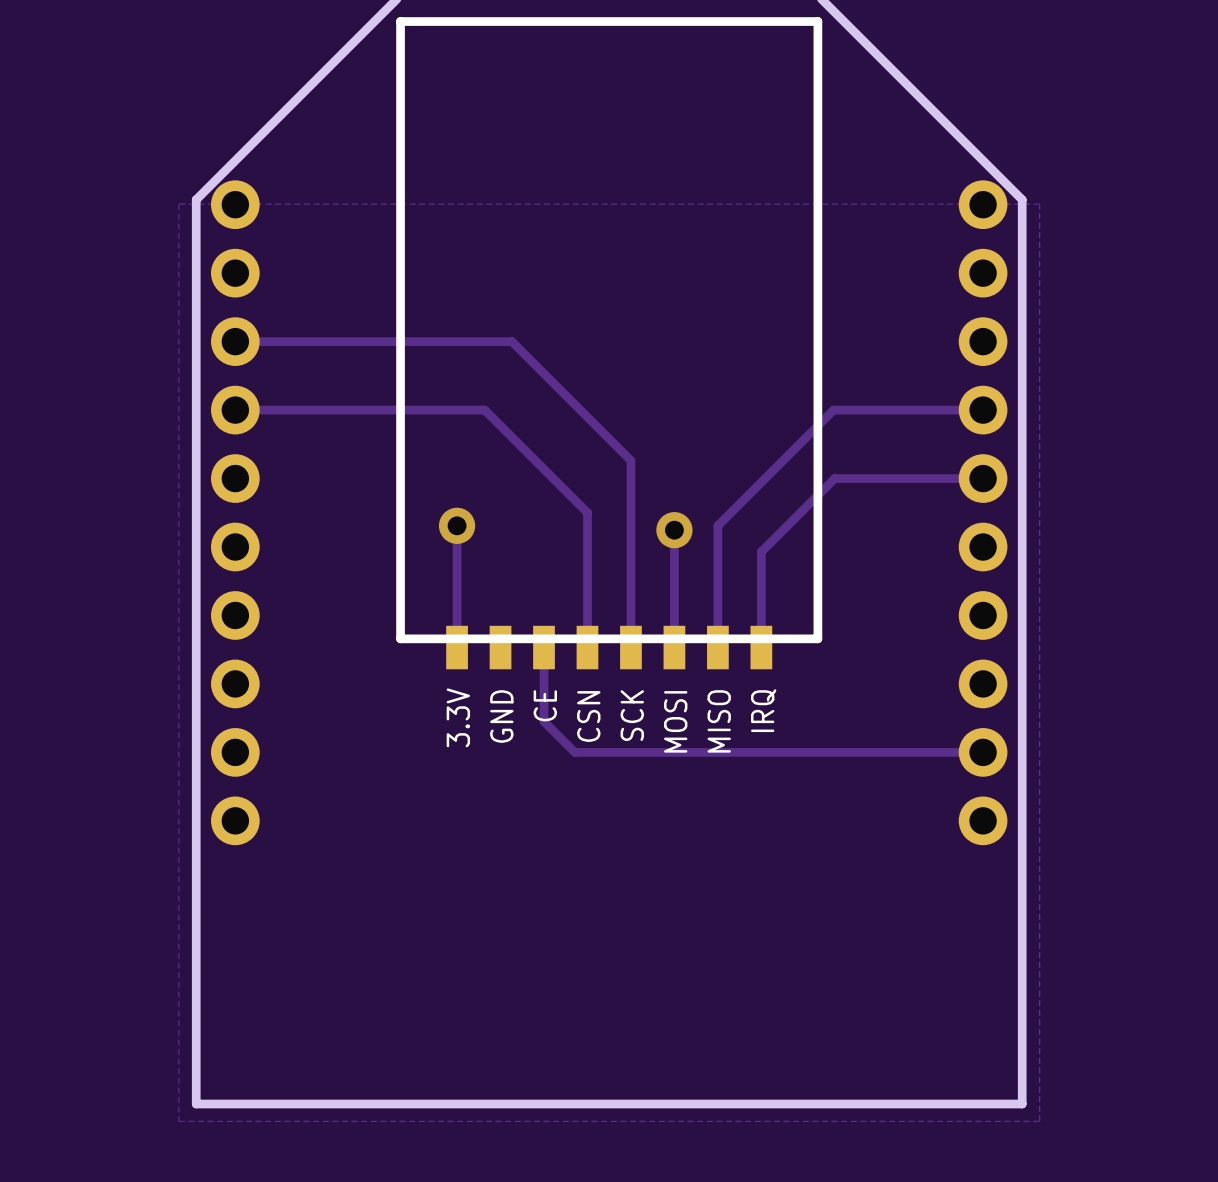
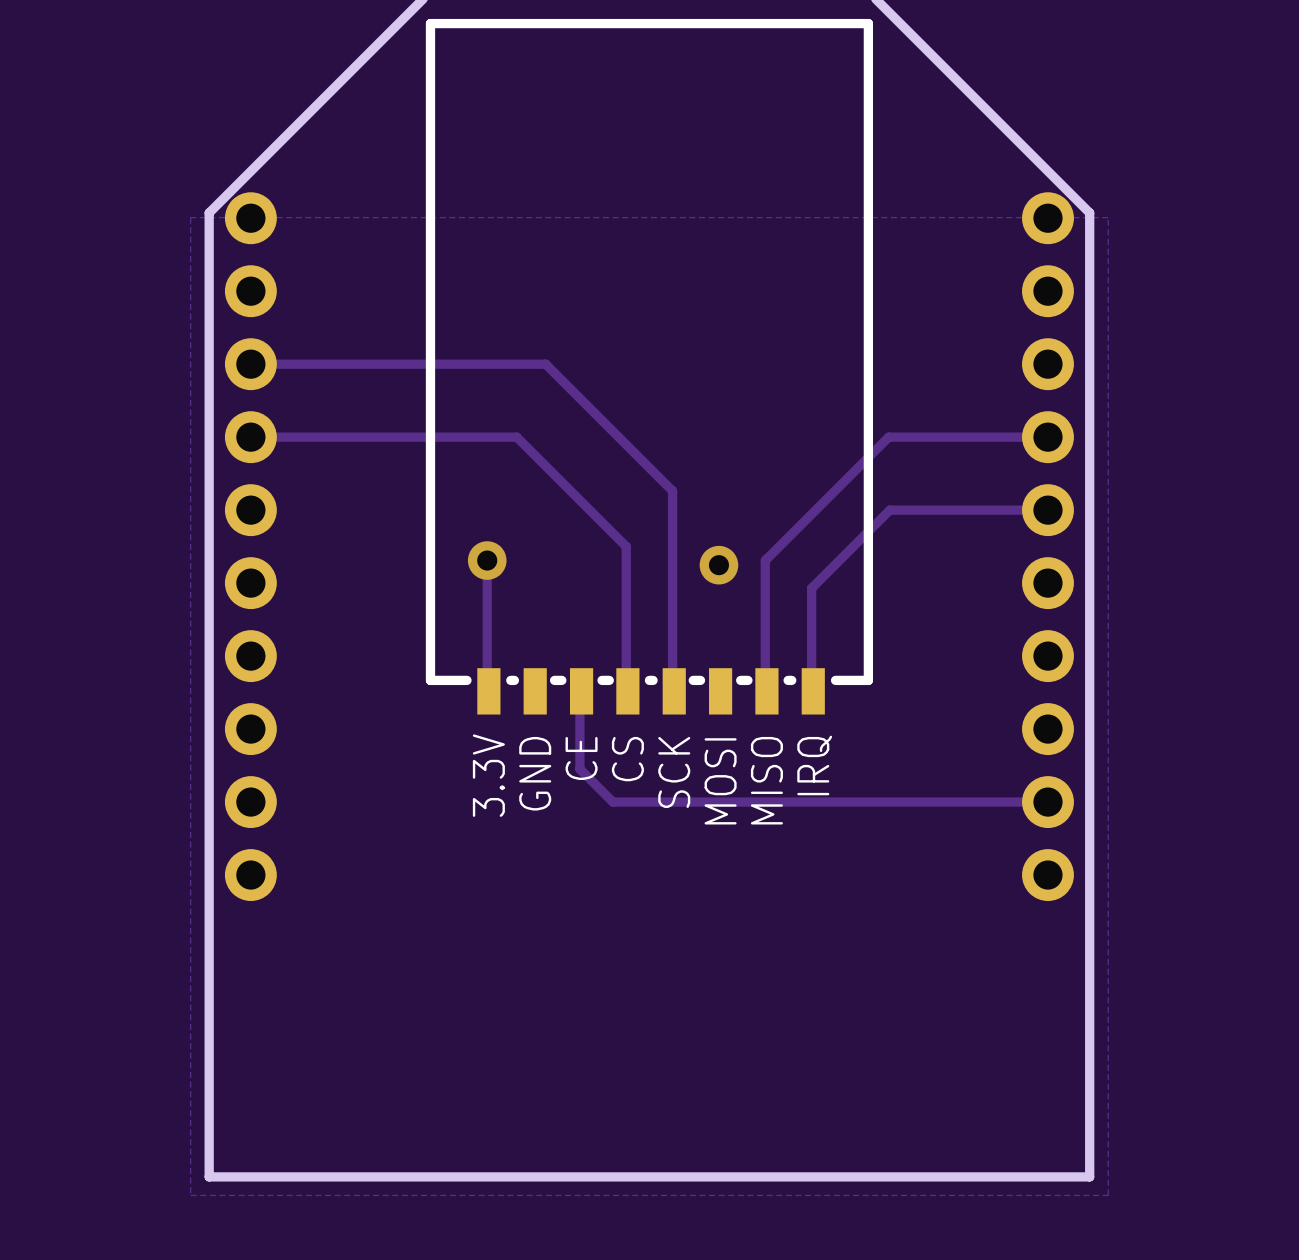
line: (817, 21) (400, 21) (400, 638) (817, 638) (817, 21) -> none
part: none -> (649, 366)
track: (674, 530) (674, 647) -> none
3.3V: (457, 647) -> none
GND: (500, 647) -> none
CE: (544, 647) -> none
CSN: (587, 647) -> none
SCK: (630, 647) -> none
MOSI: (674, 647) -> none
MISO: (717, 647) -> none
IRQ: (761, 647) -> none

